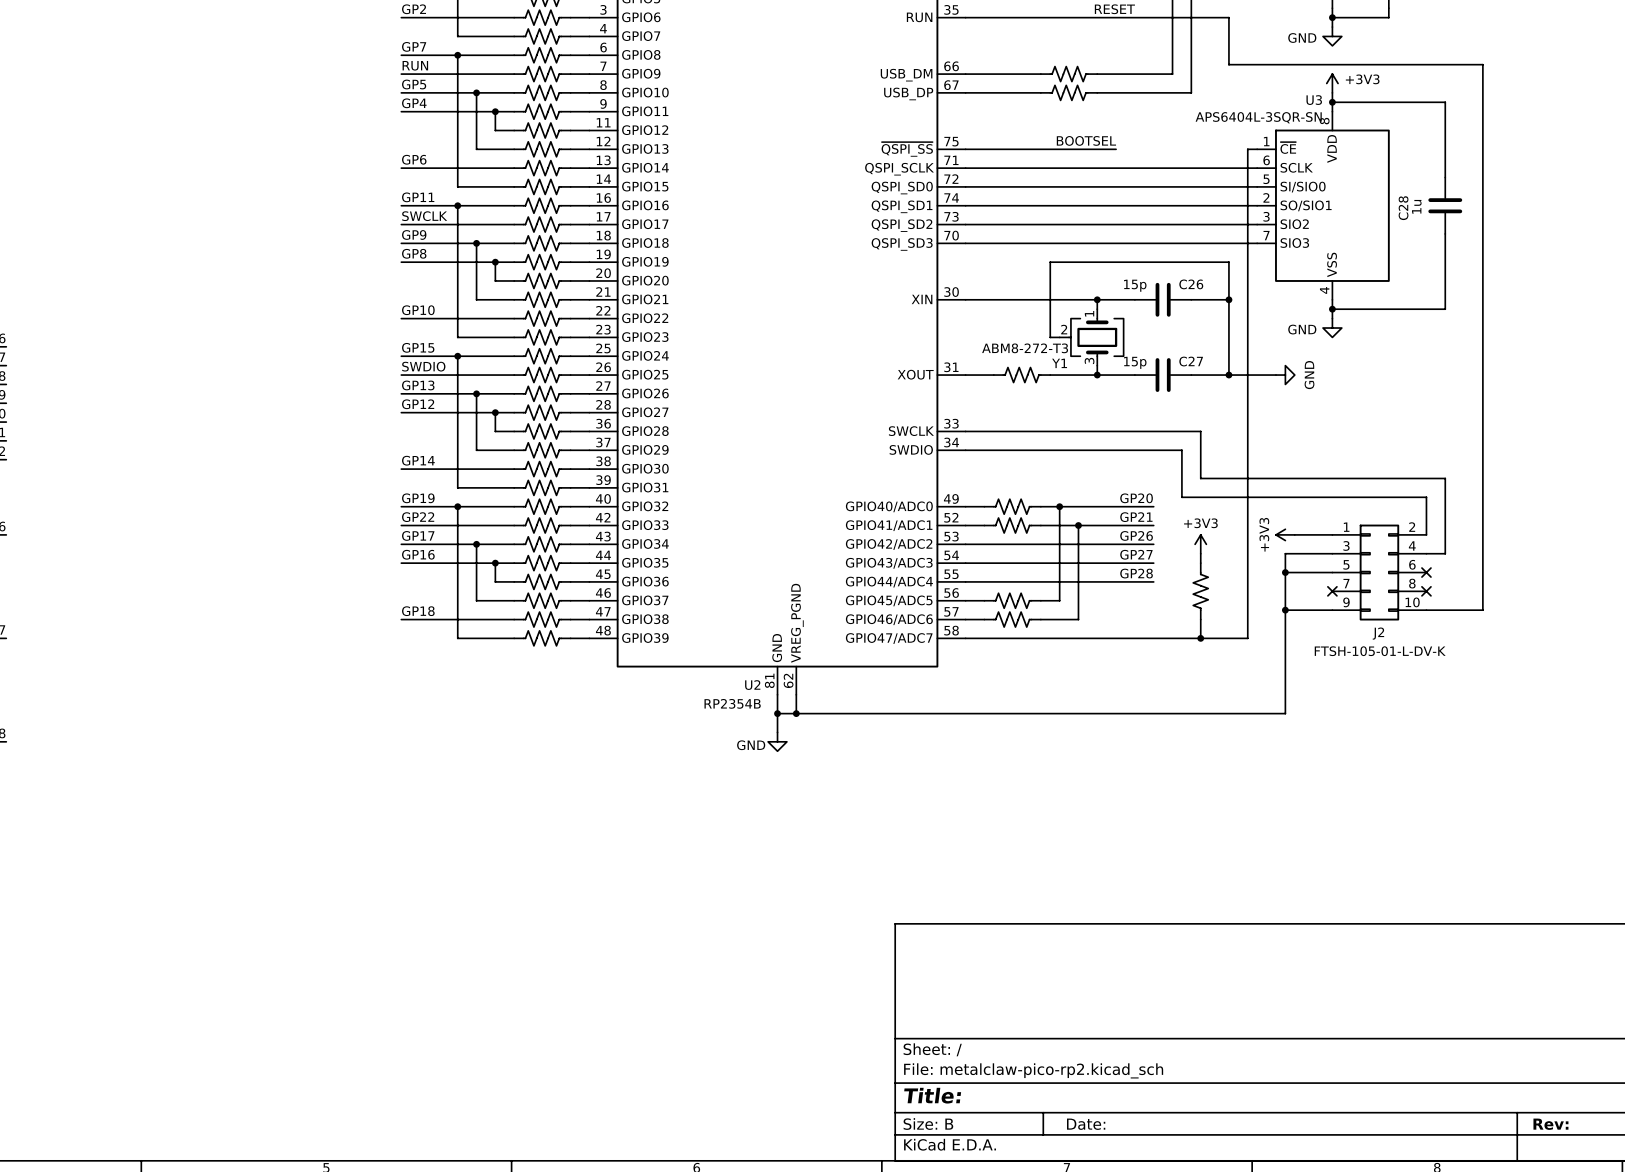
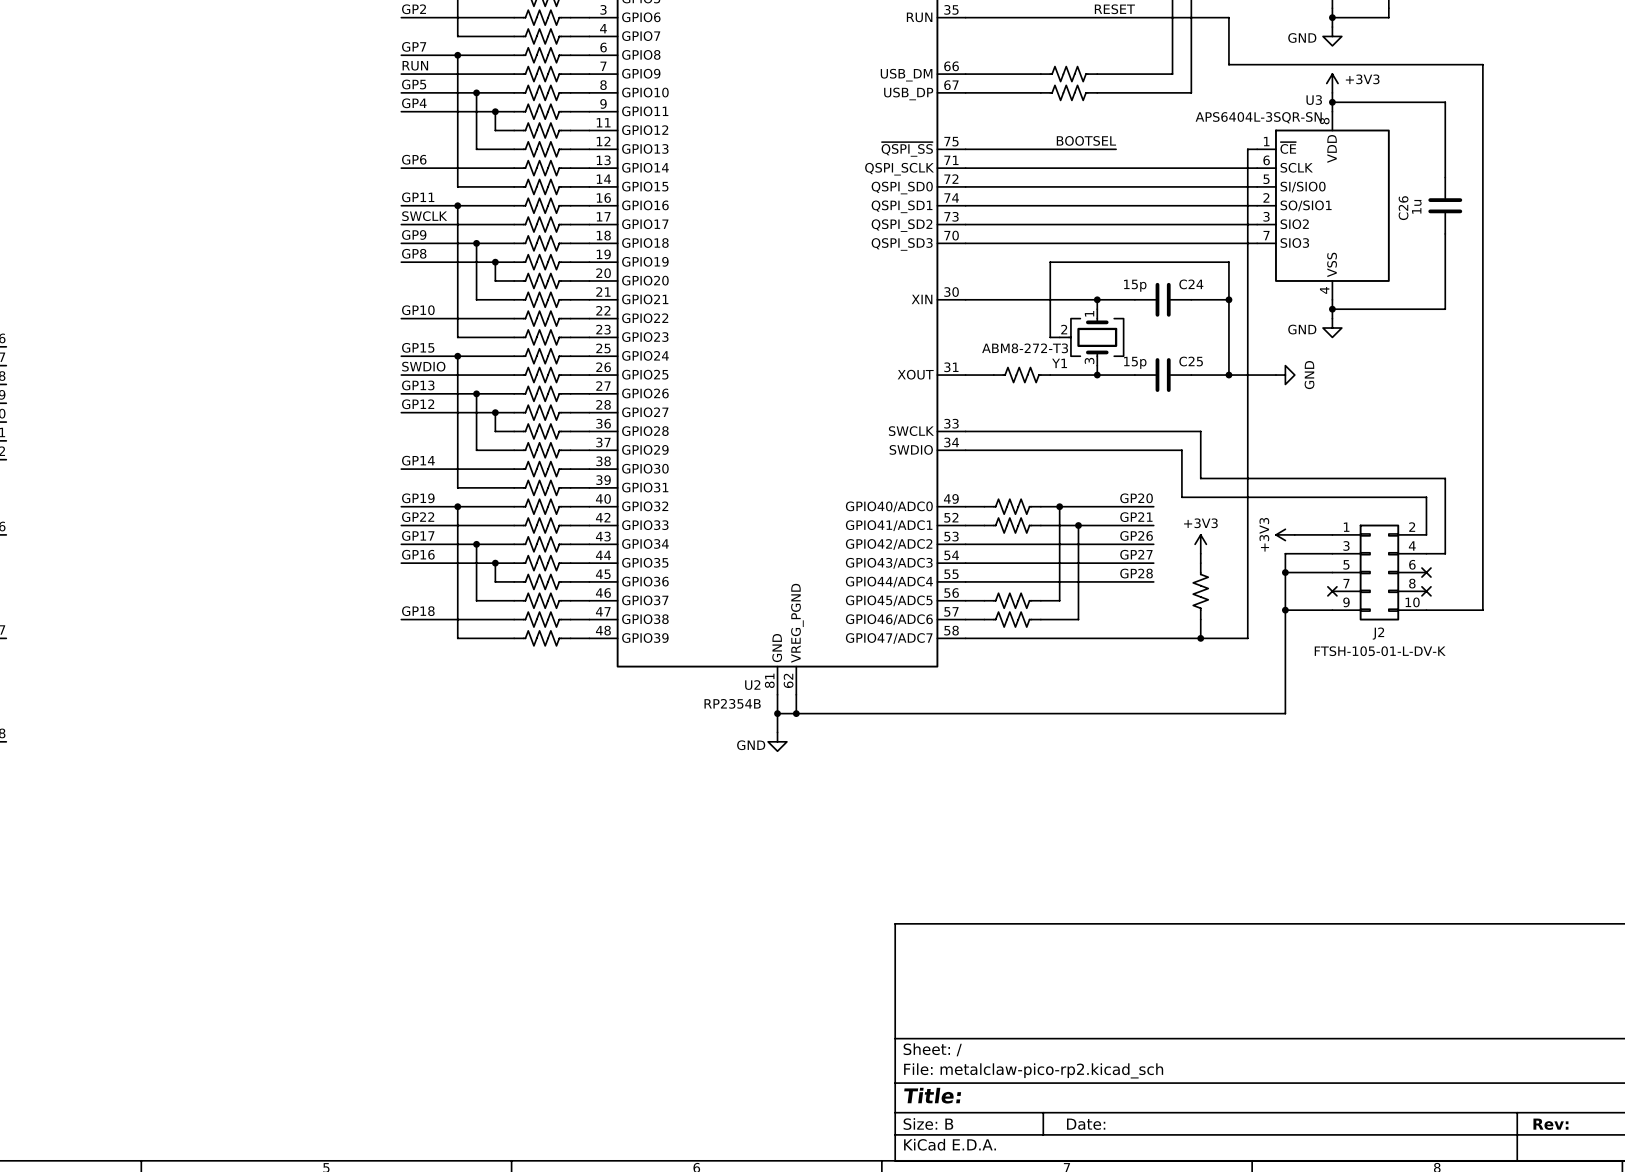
C28 name: C28 (1403, 208) -> C26 (1403, 208)
C26 name: C26 (1191, 284) -> C24 (1191, 284)
C27 name: C27 (1191, 361) -> C25 (1191, 361)

